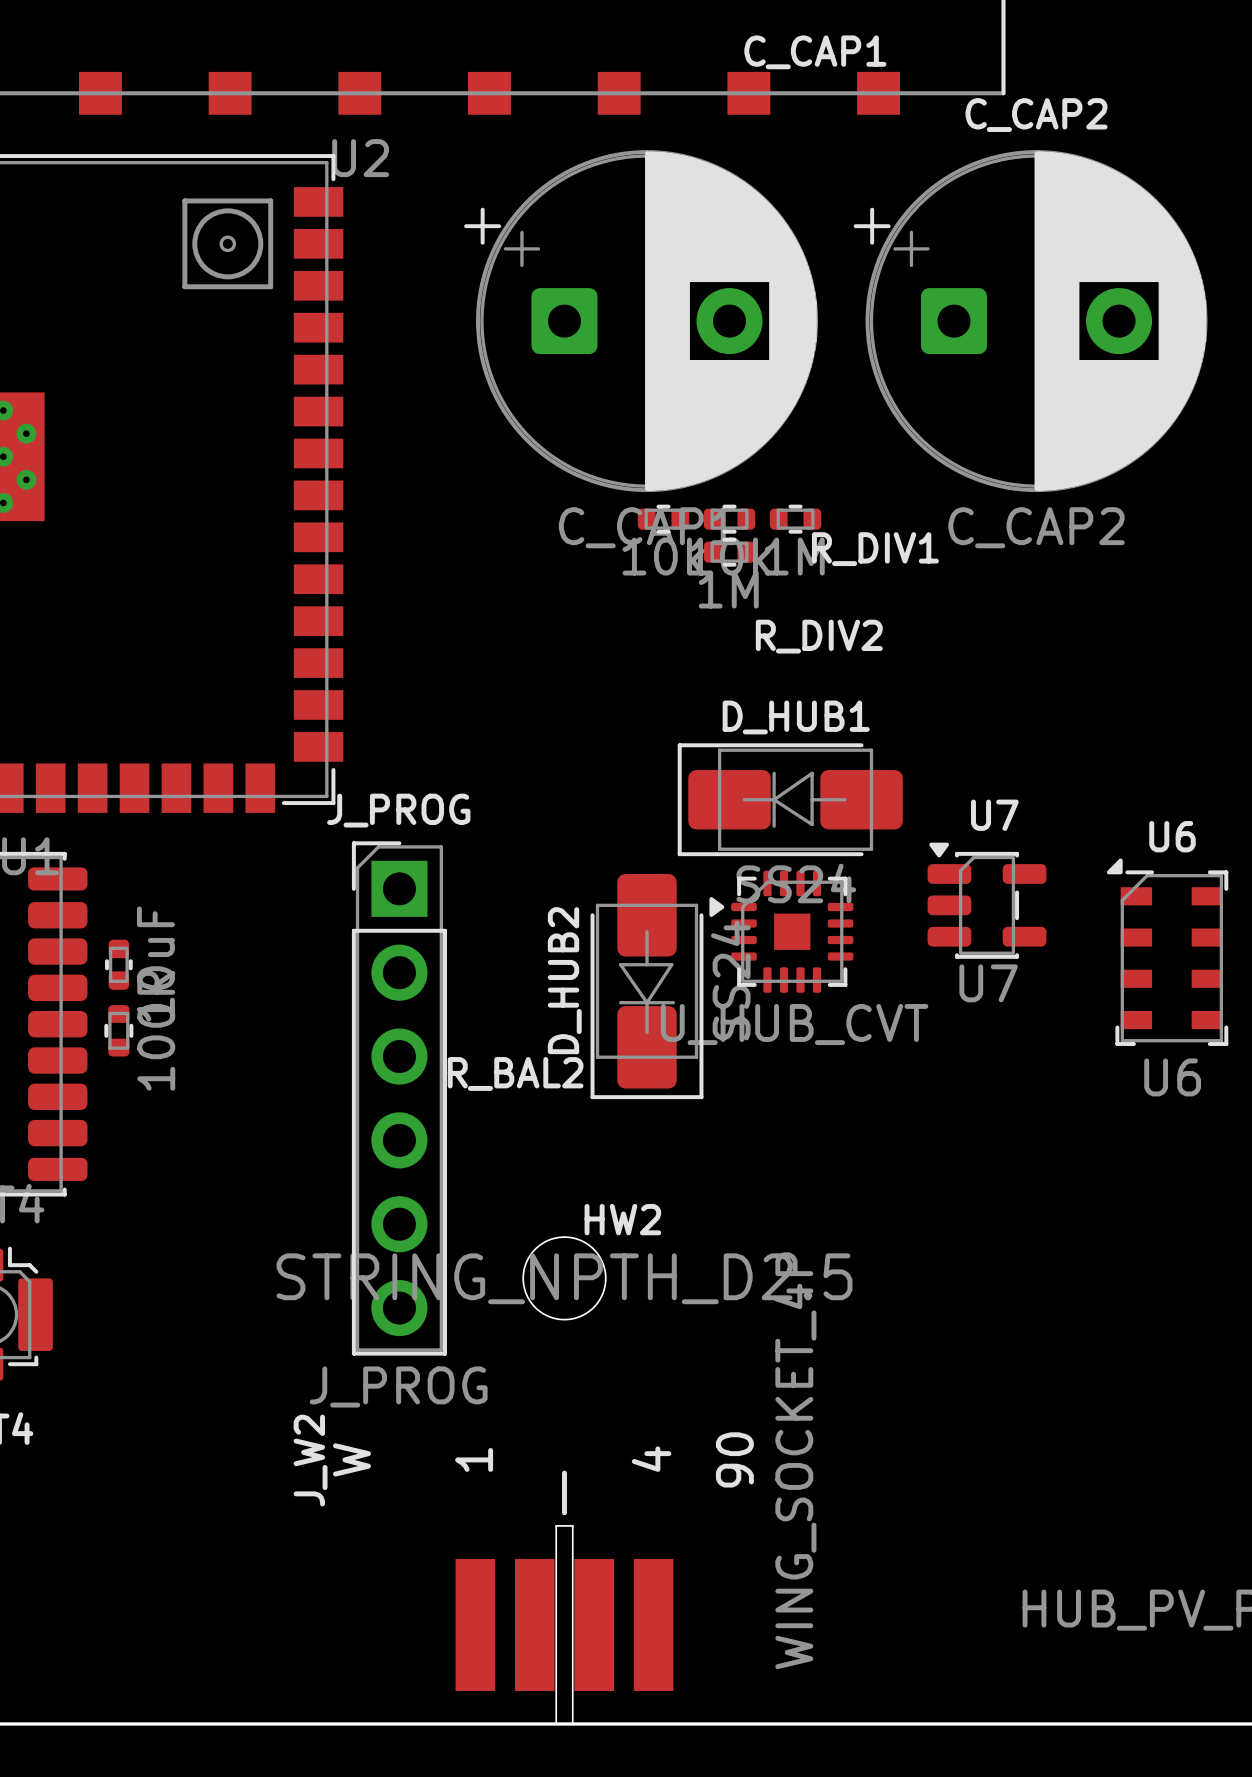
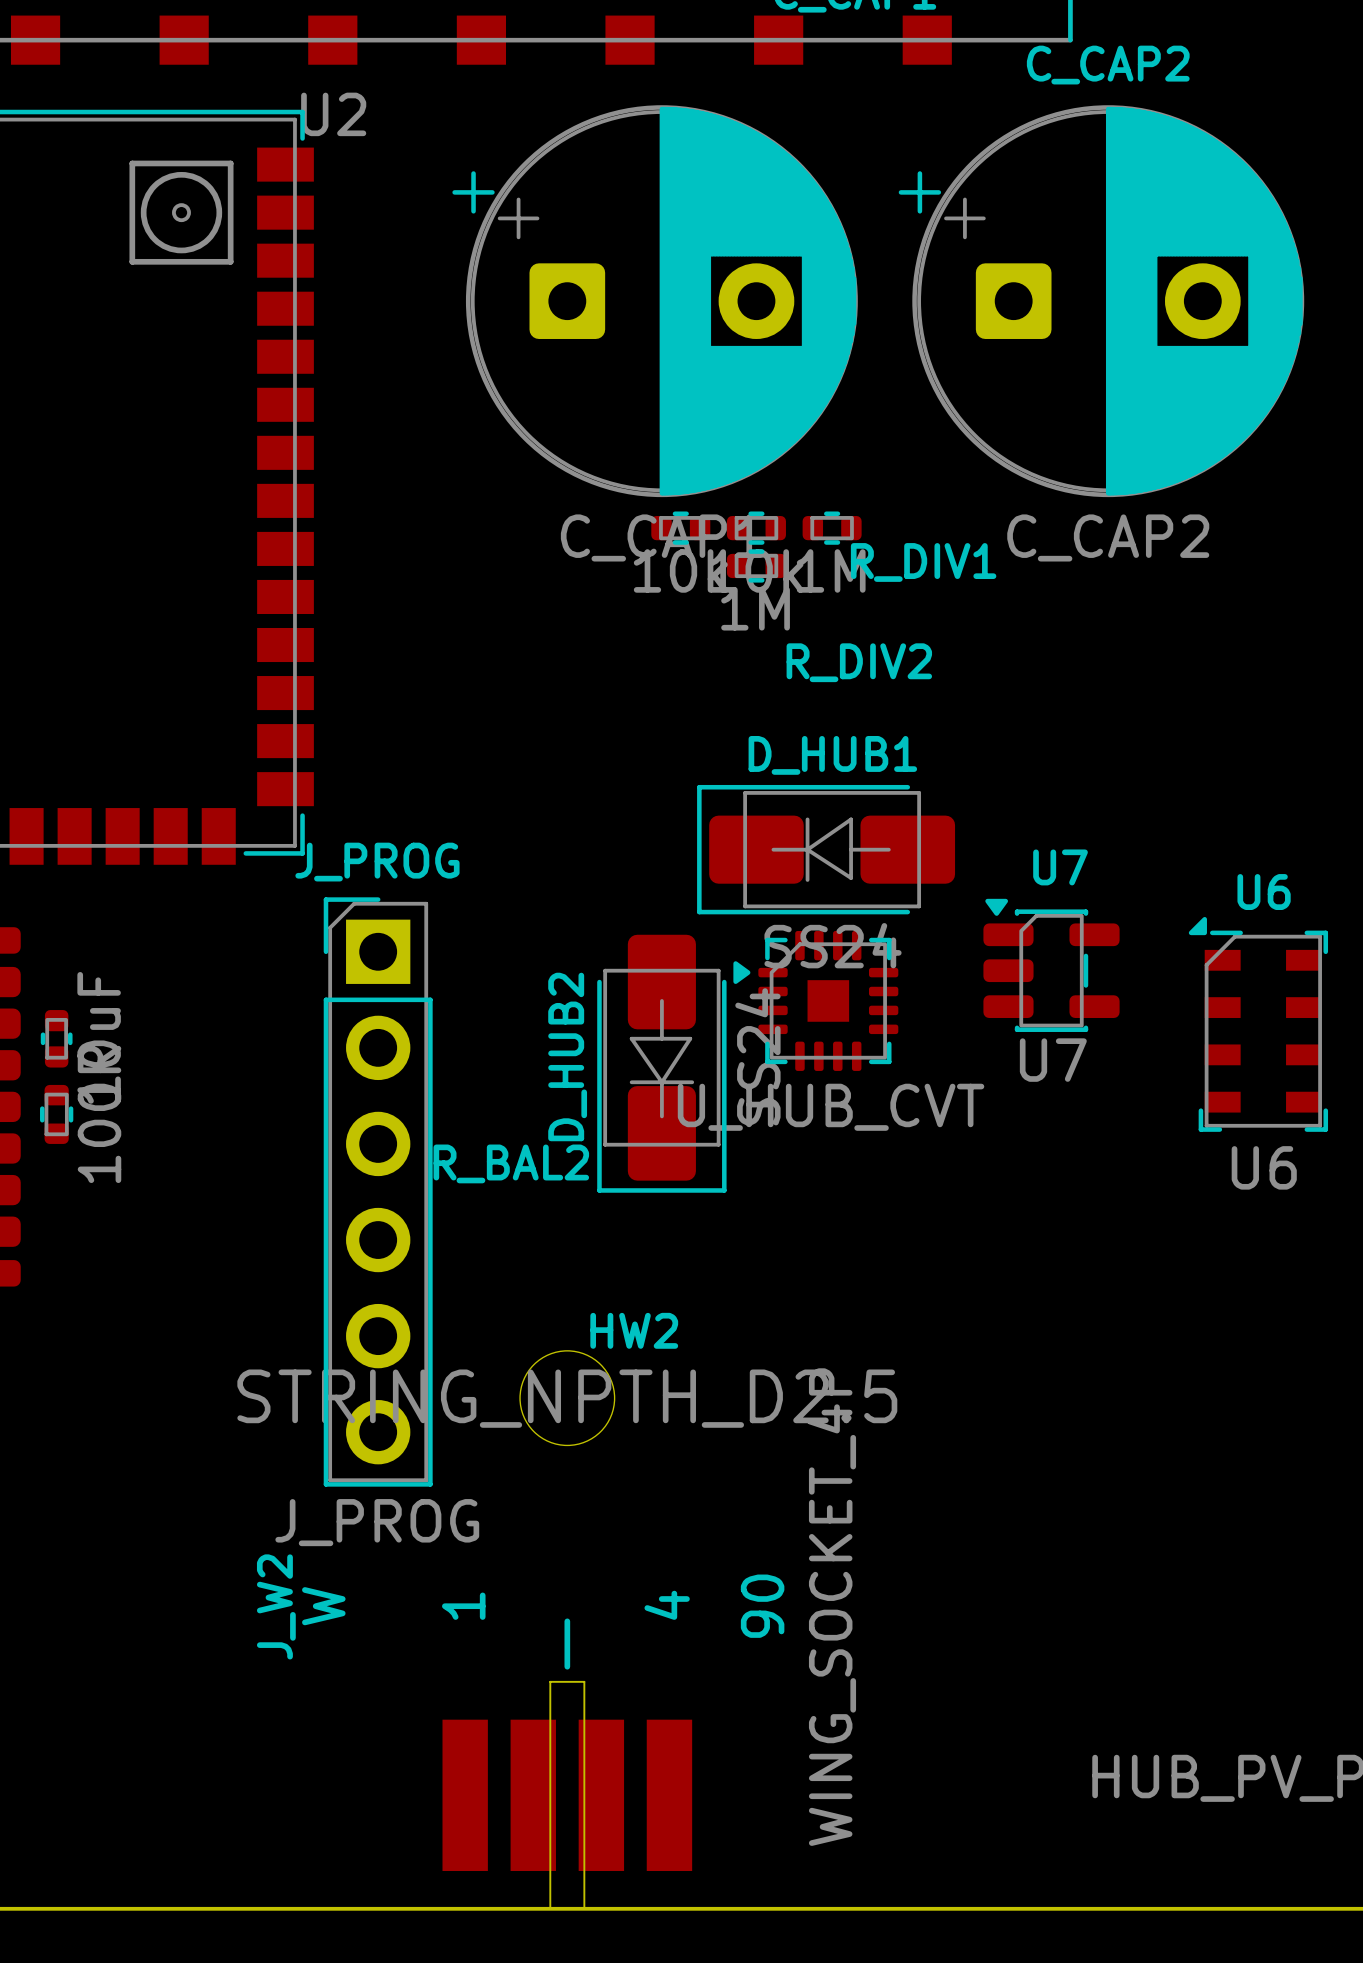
J_W2 footprint: [455, 1470, 674, 1725] -> [442, 1618, 693, 1910]

